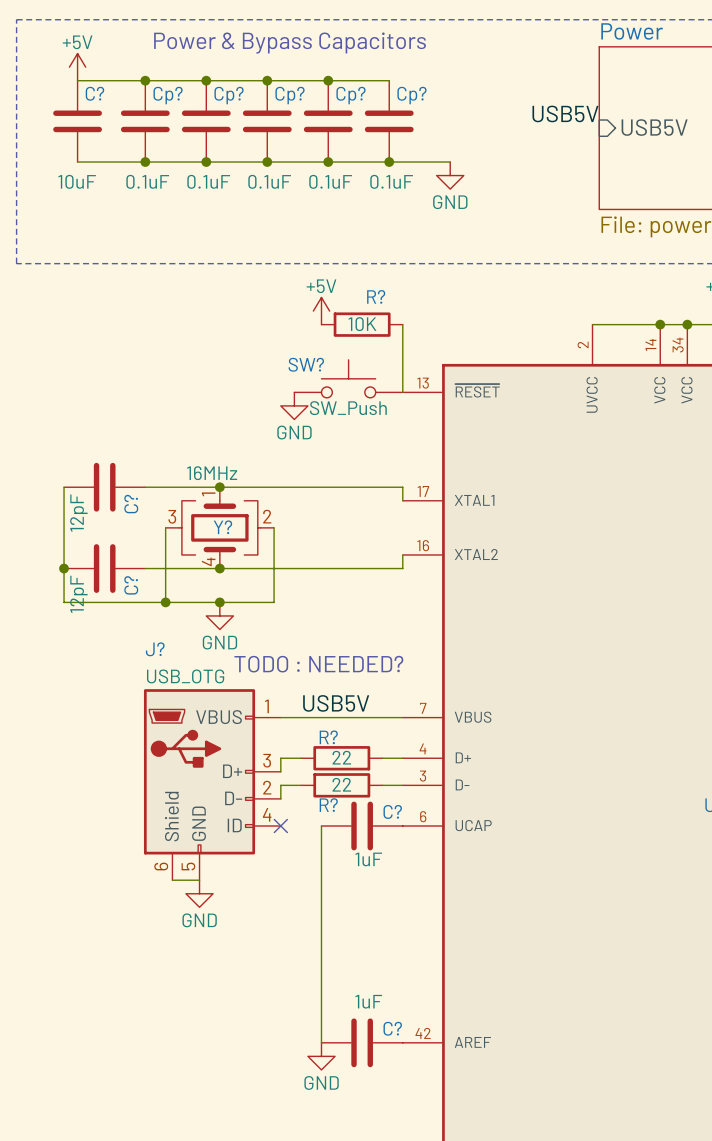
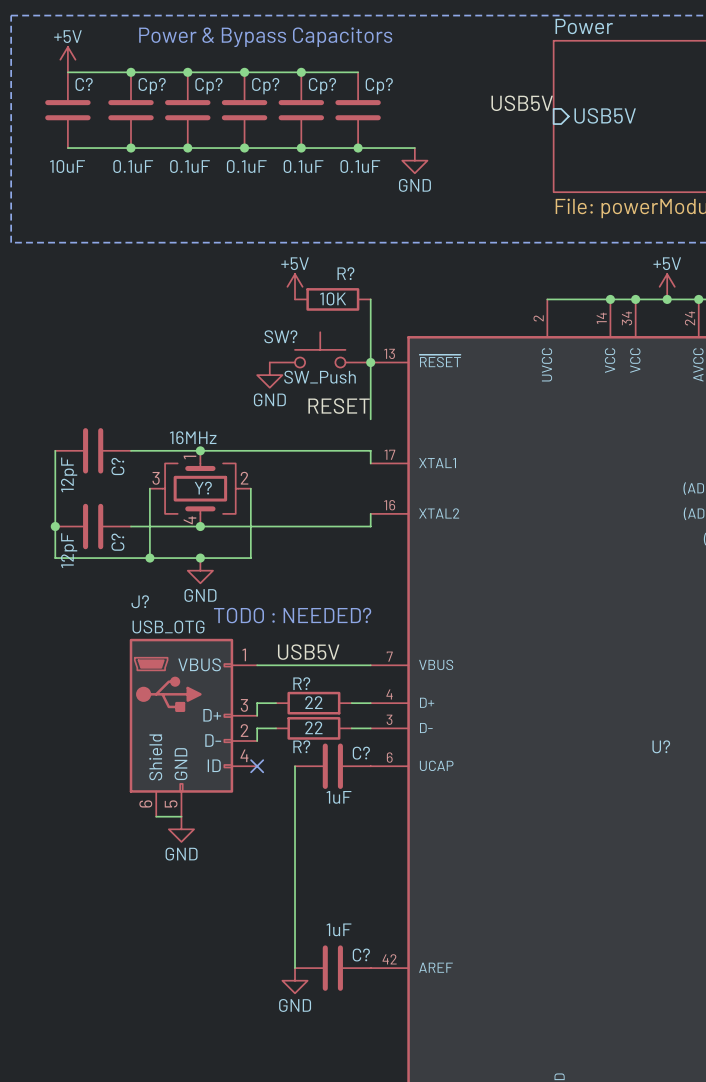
wire: none -> (370, 362) (370, 419)
junction: none -> (370, 362)
label: none -> RESET (339, 406)

